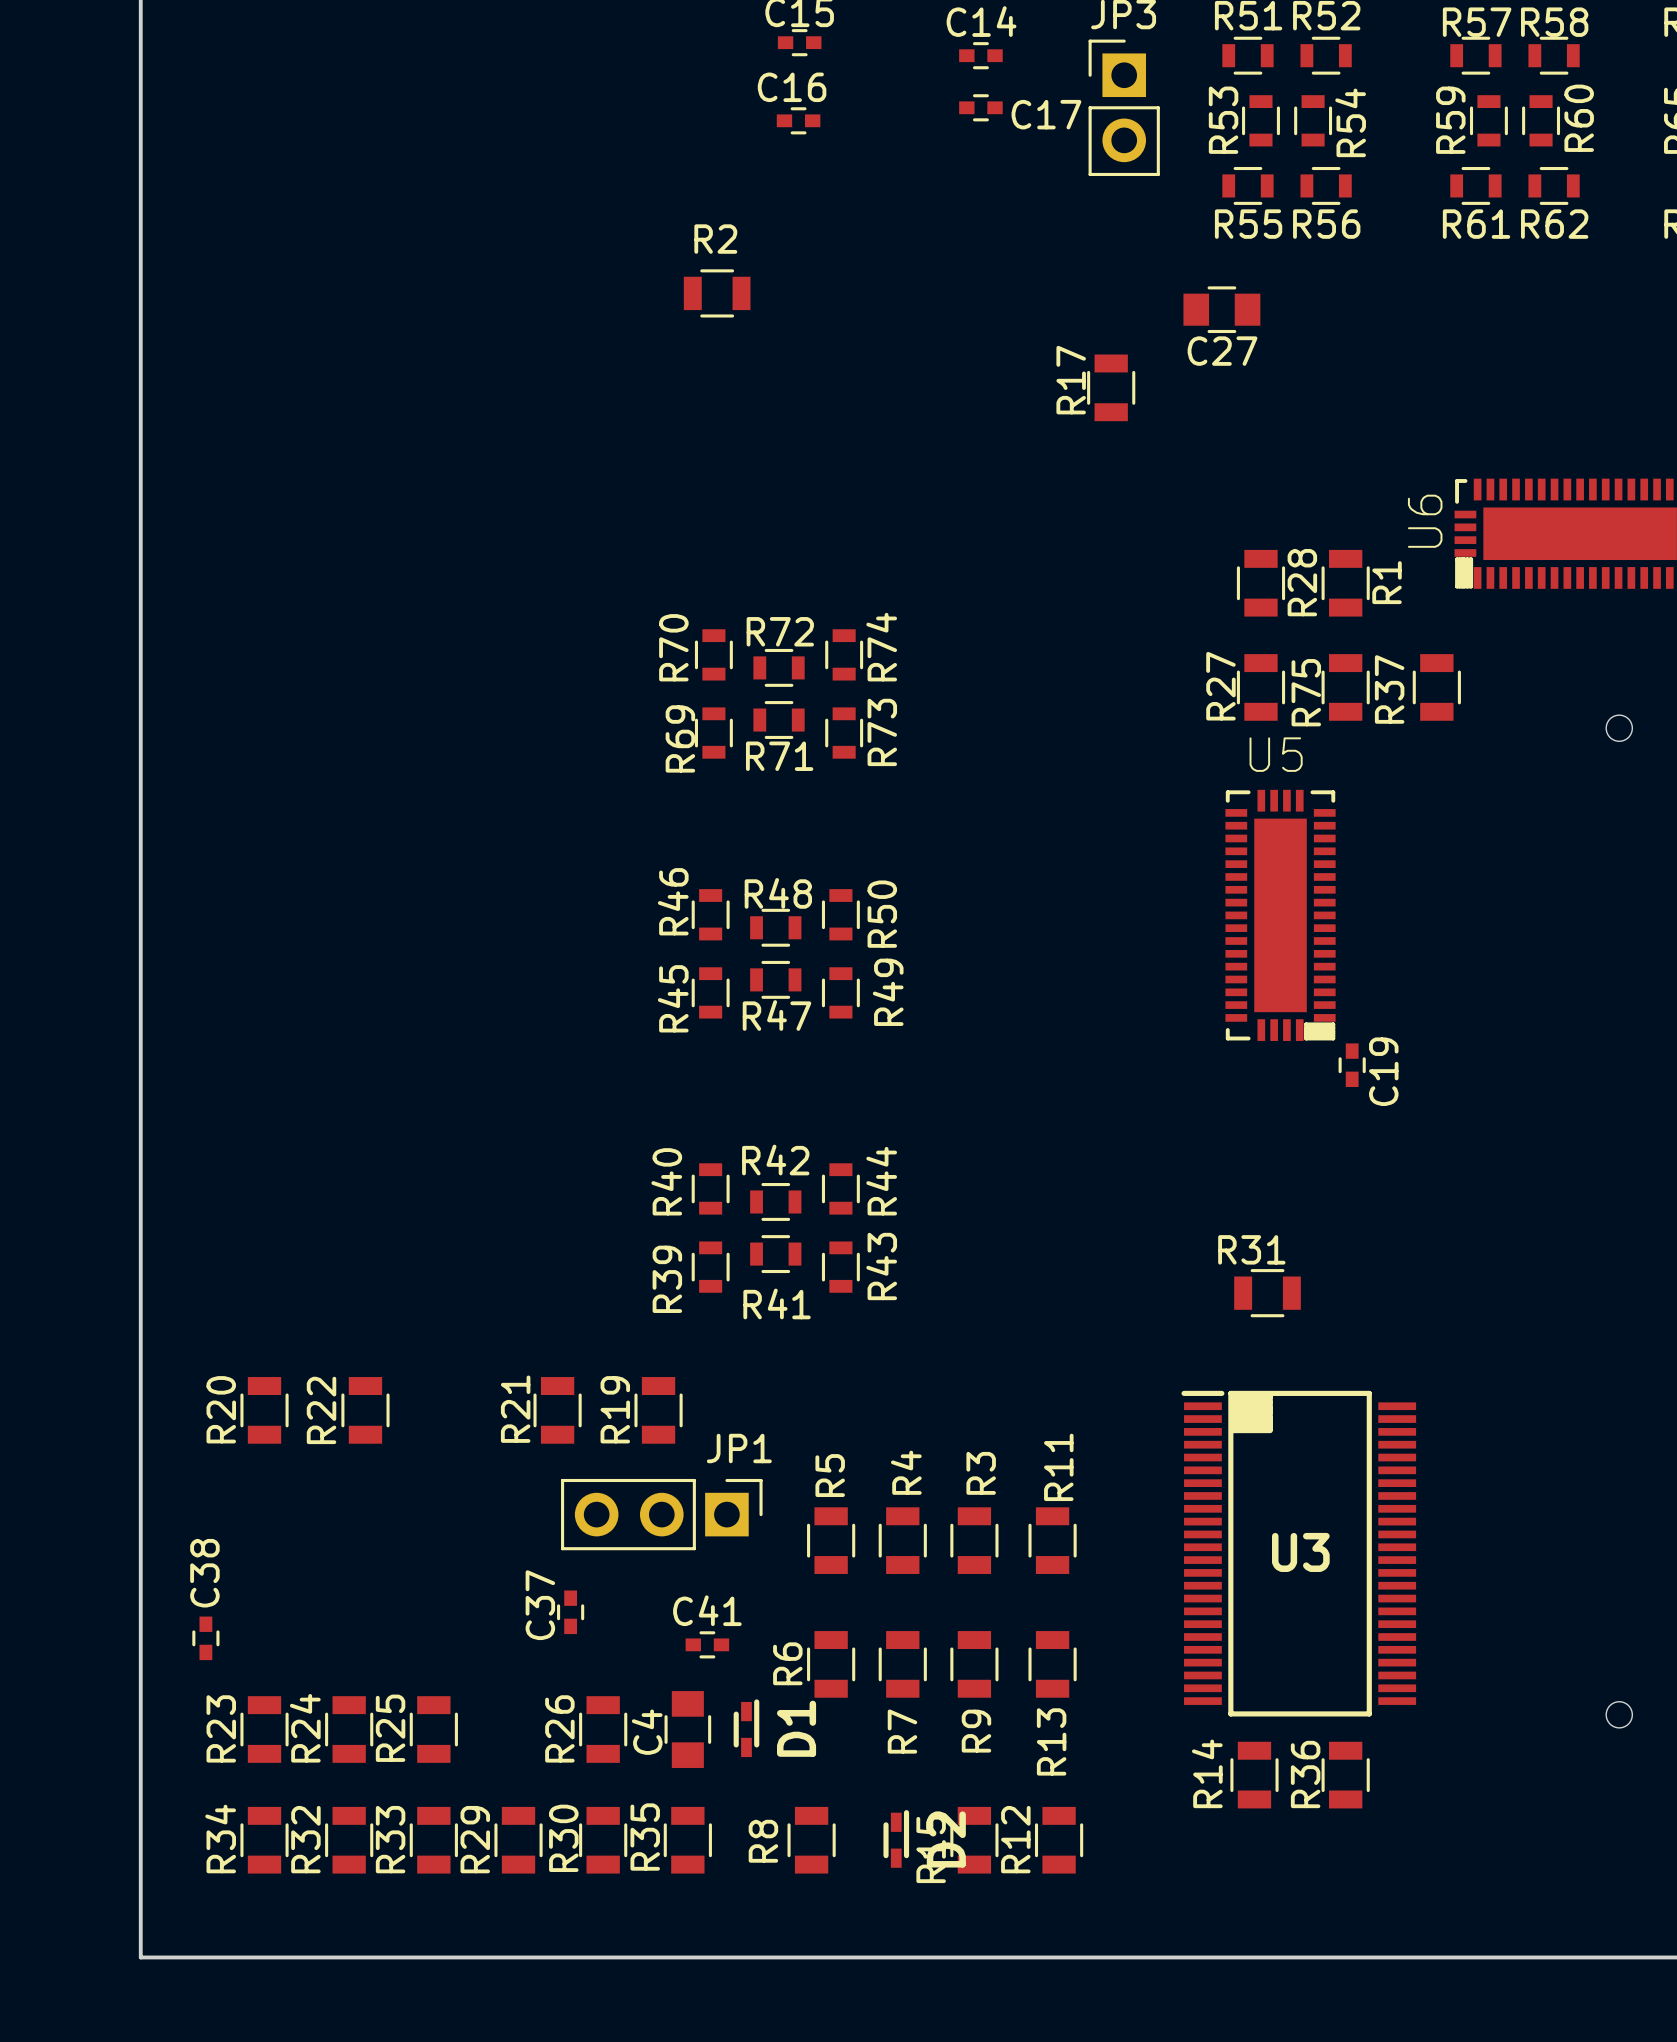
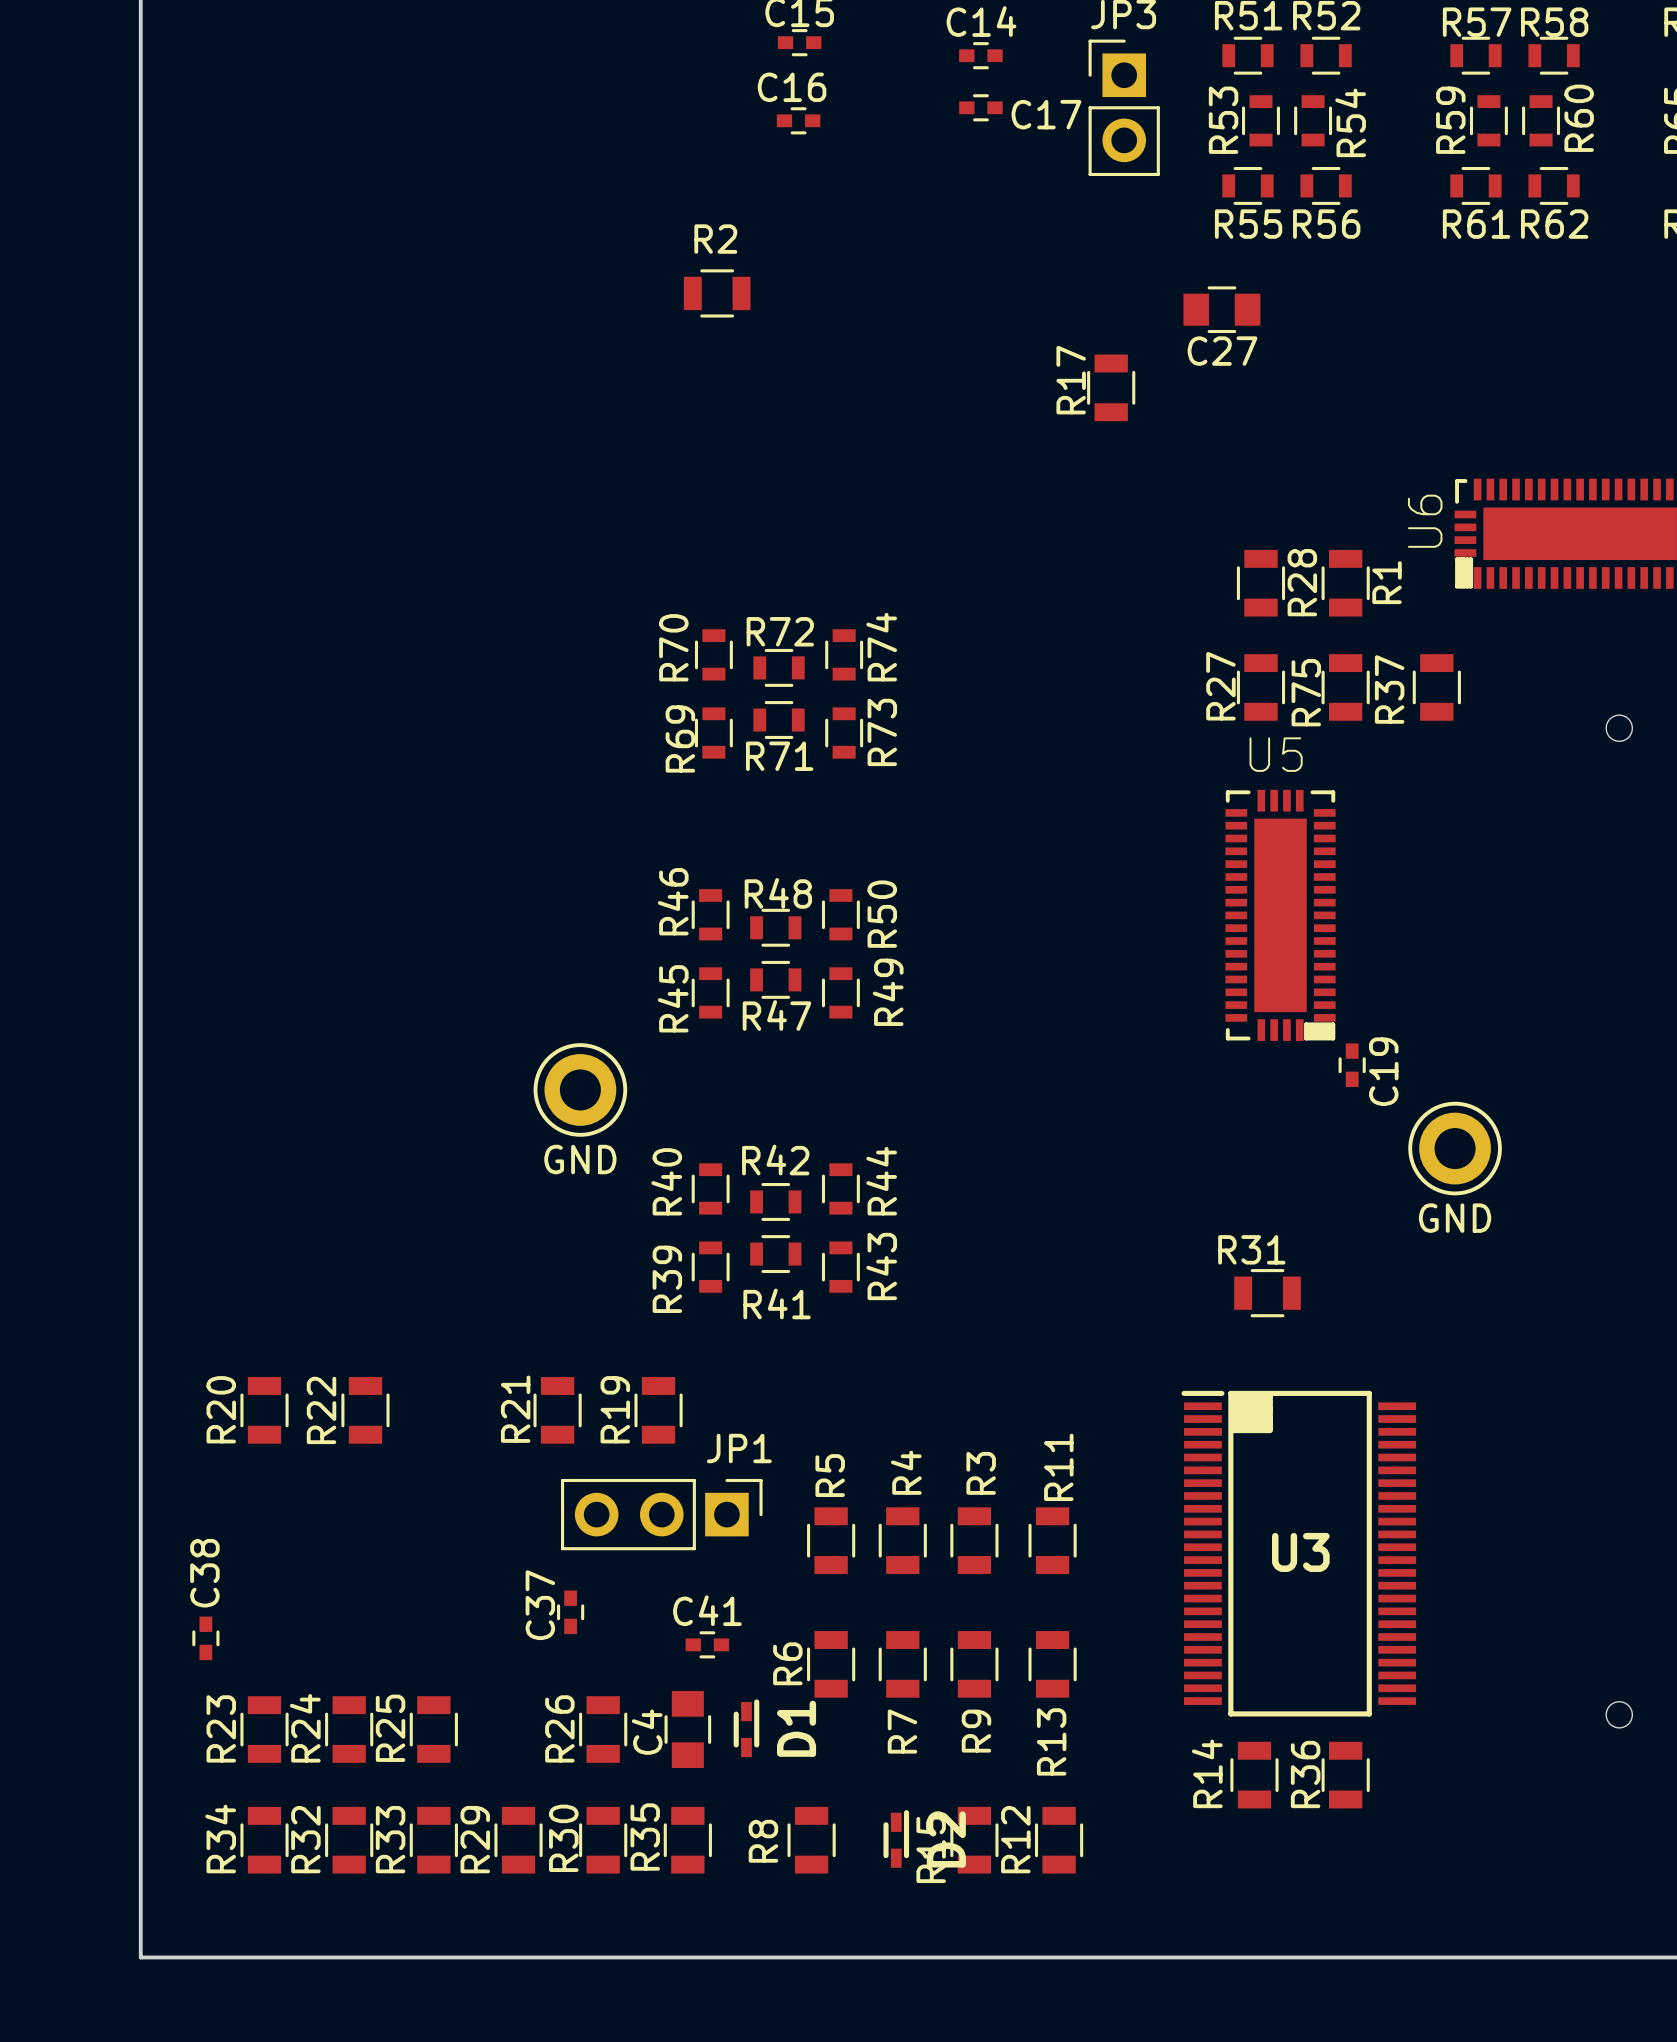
part: none -> GND (580, 1089)
part: none -> GND (1455, 1148)

